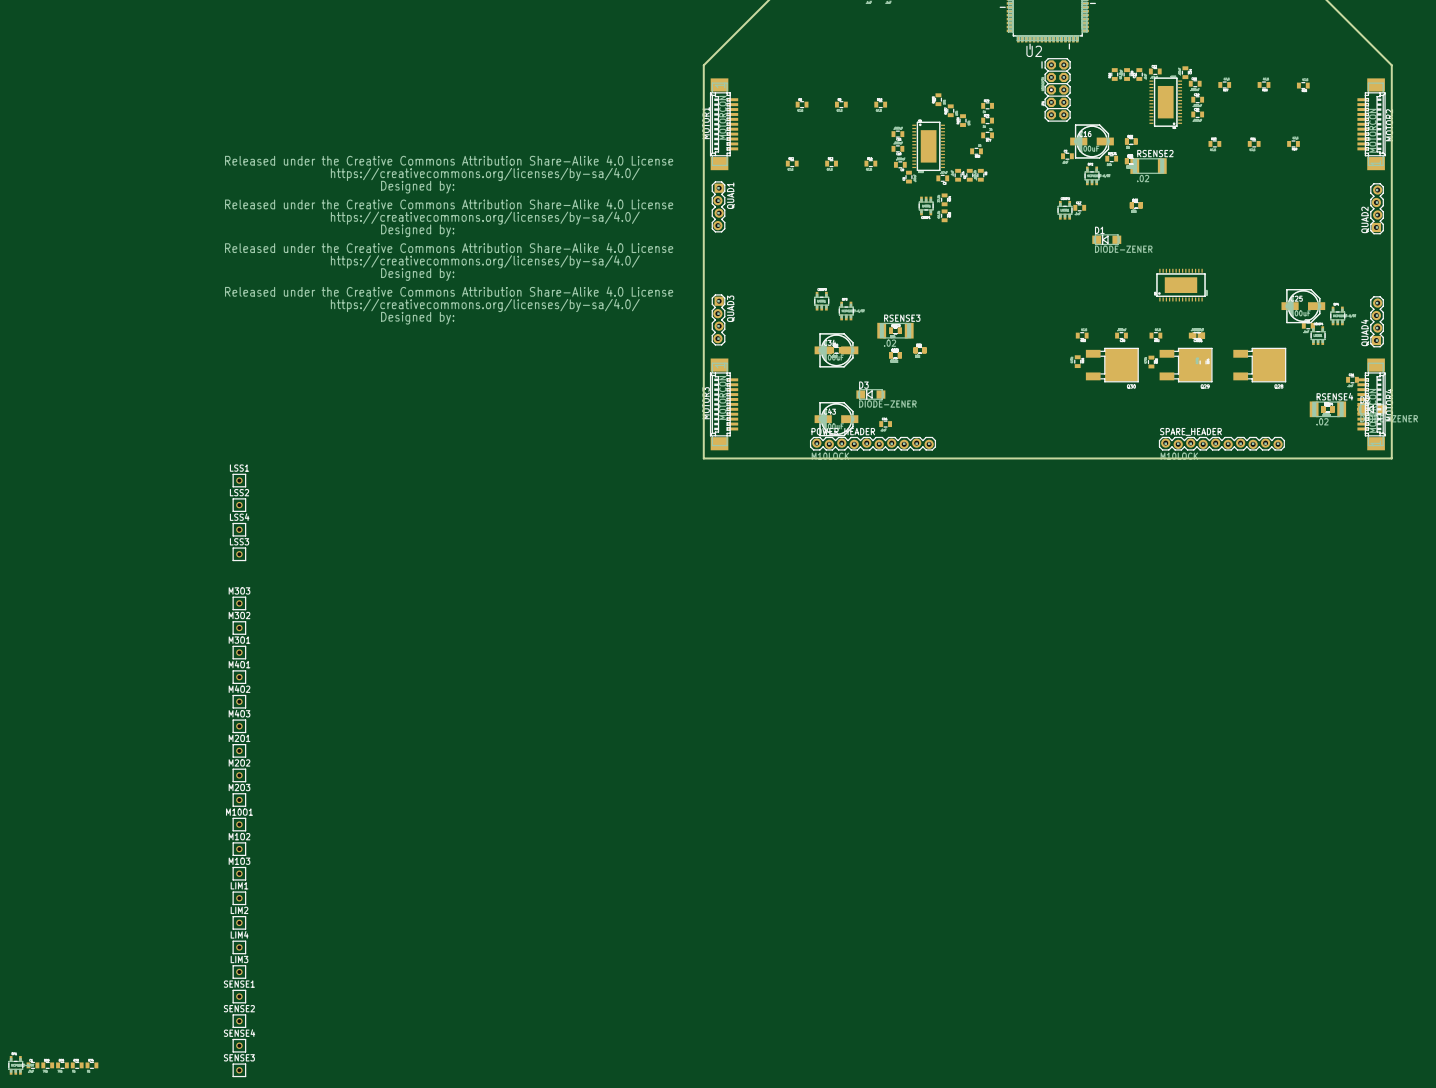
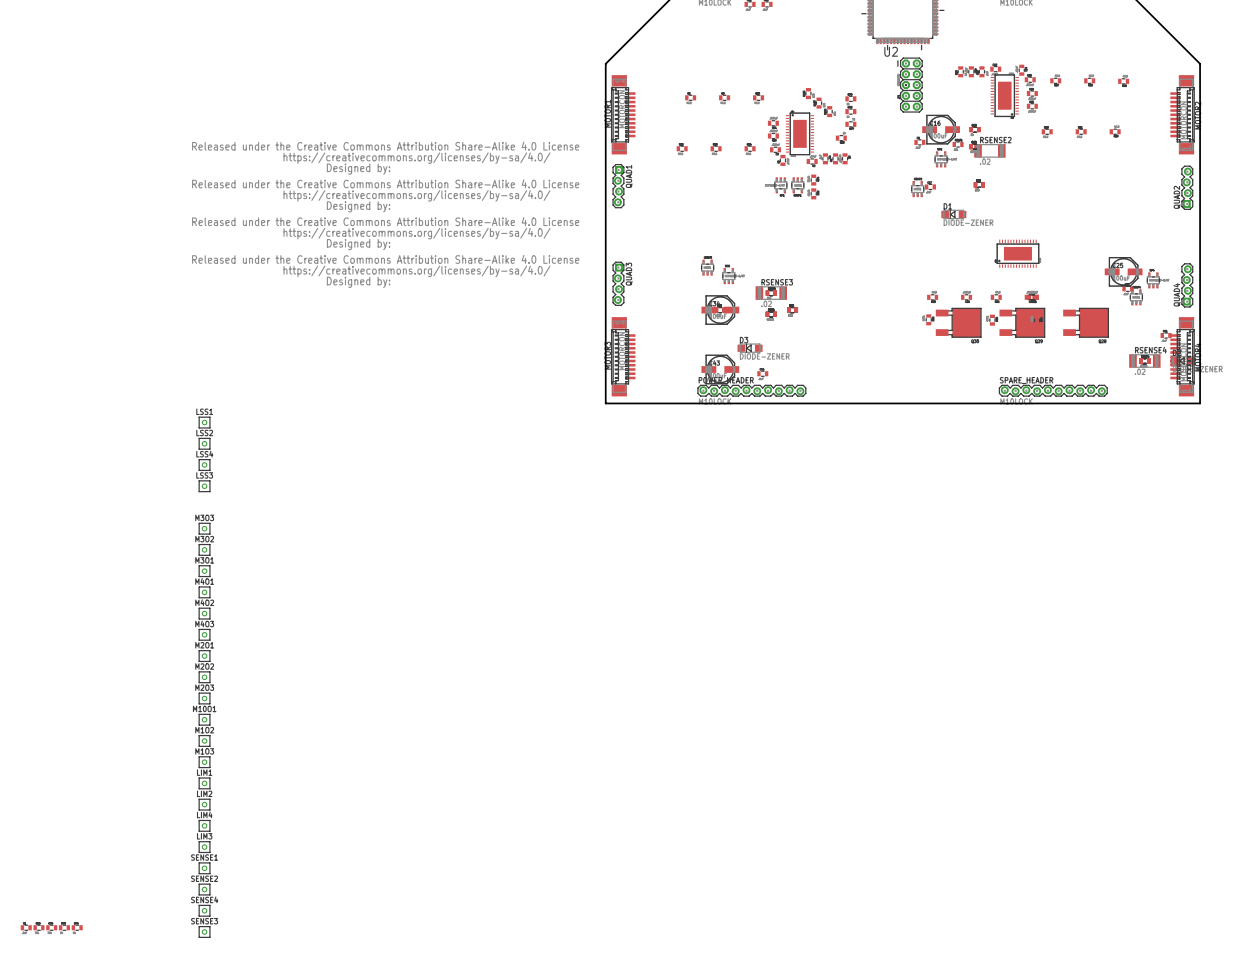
part rotation: 0° (15, 1065) -> 180° (780, 185)
part position: (15, 1065) -> (780, 185)

